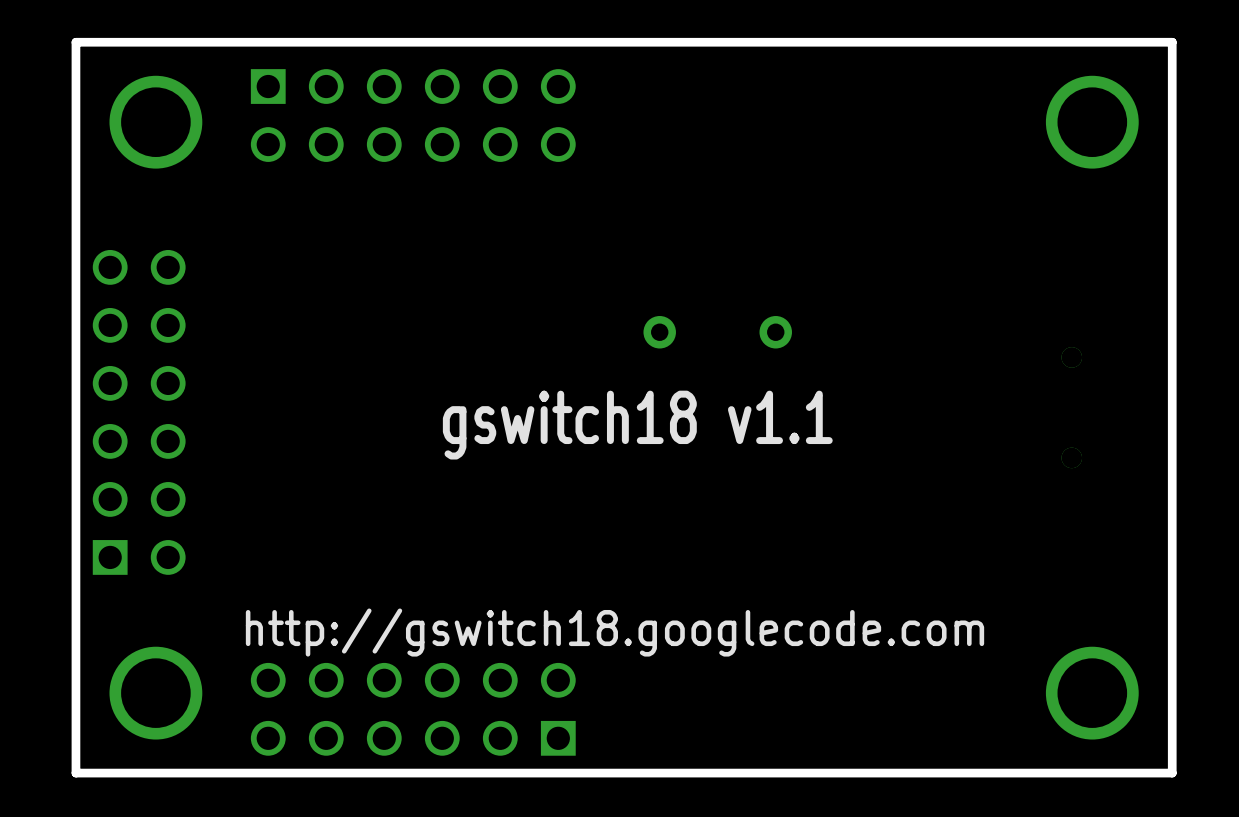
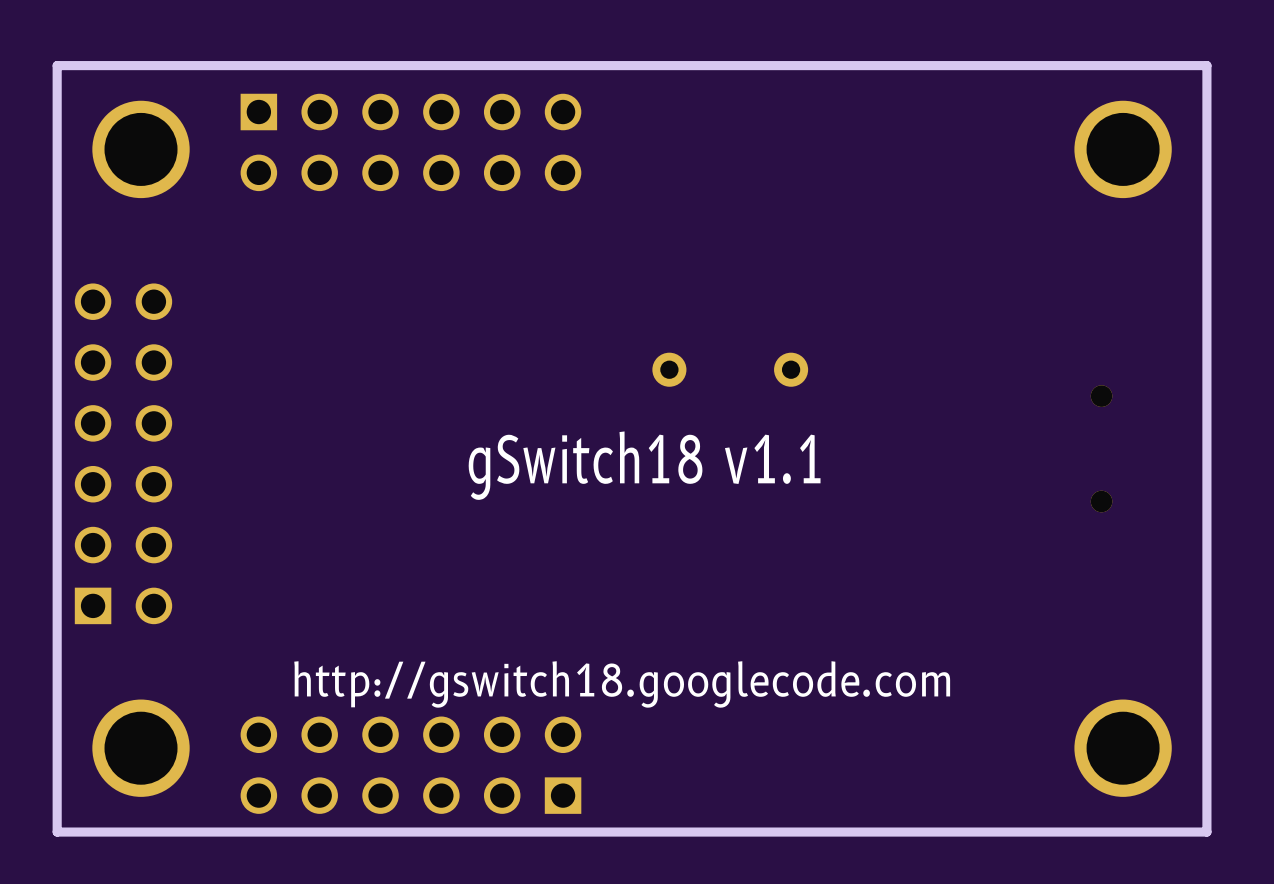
text: gswitch18 v1.1 (637, 425) -> gSwitch18 v1.1 (644, 465)

